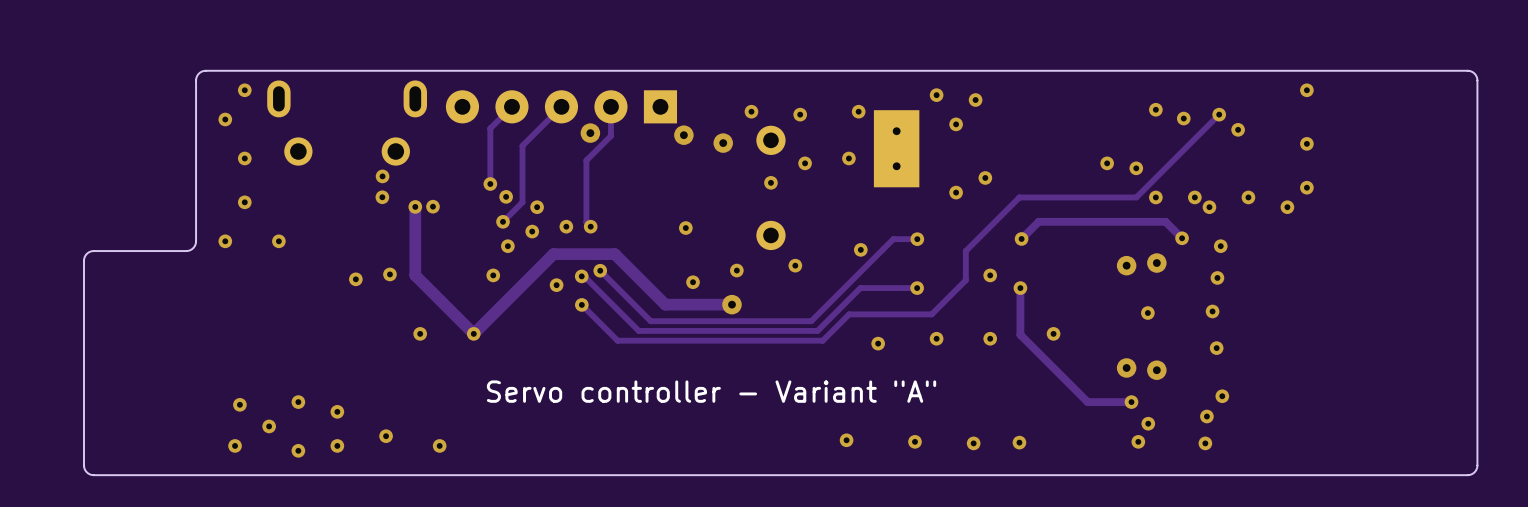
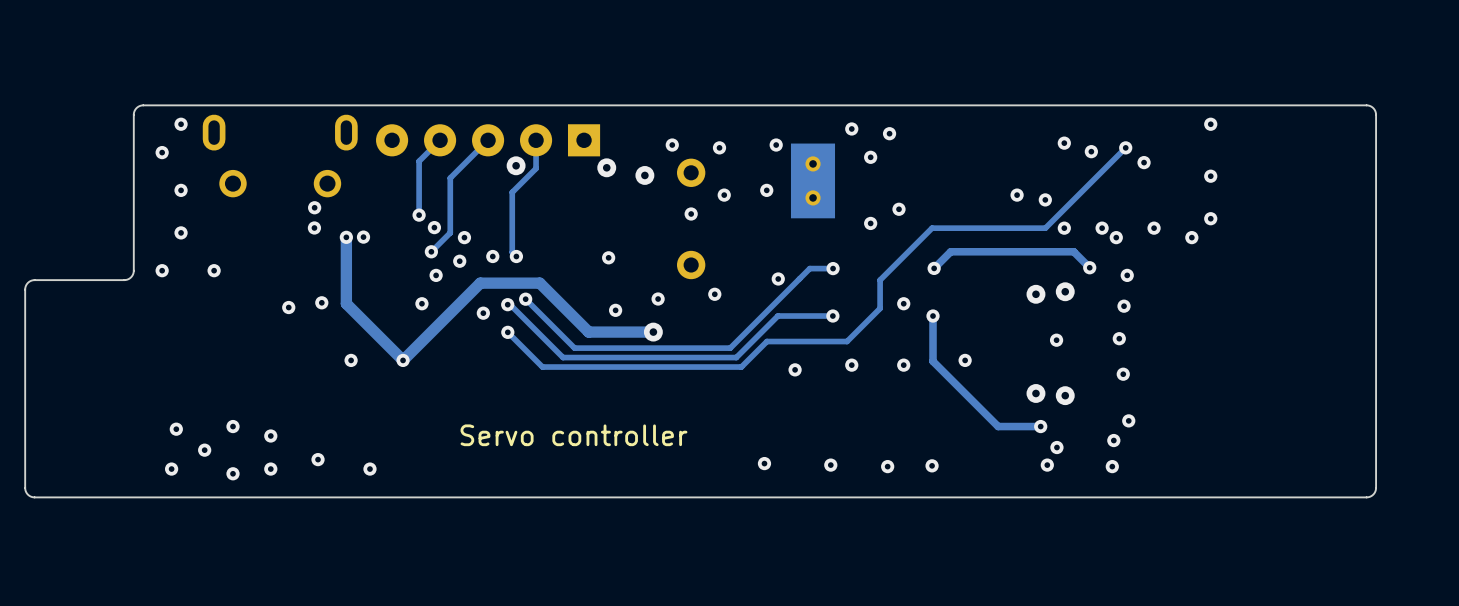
text: Servo controller - Variant "A" (711, 391) -> Servo controller (573, 435)

